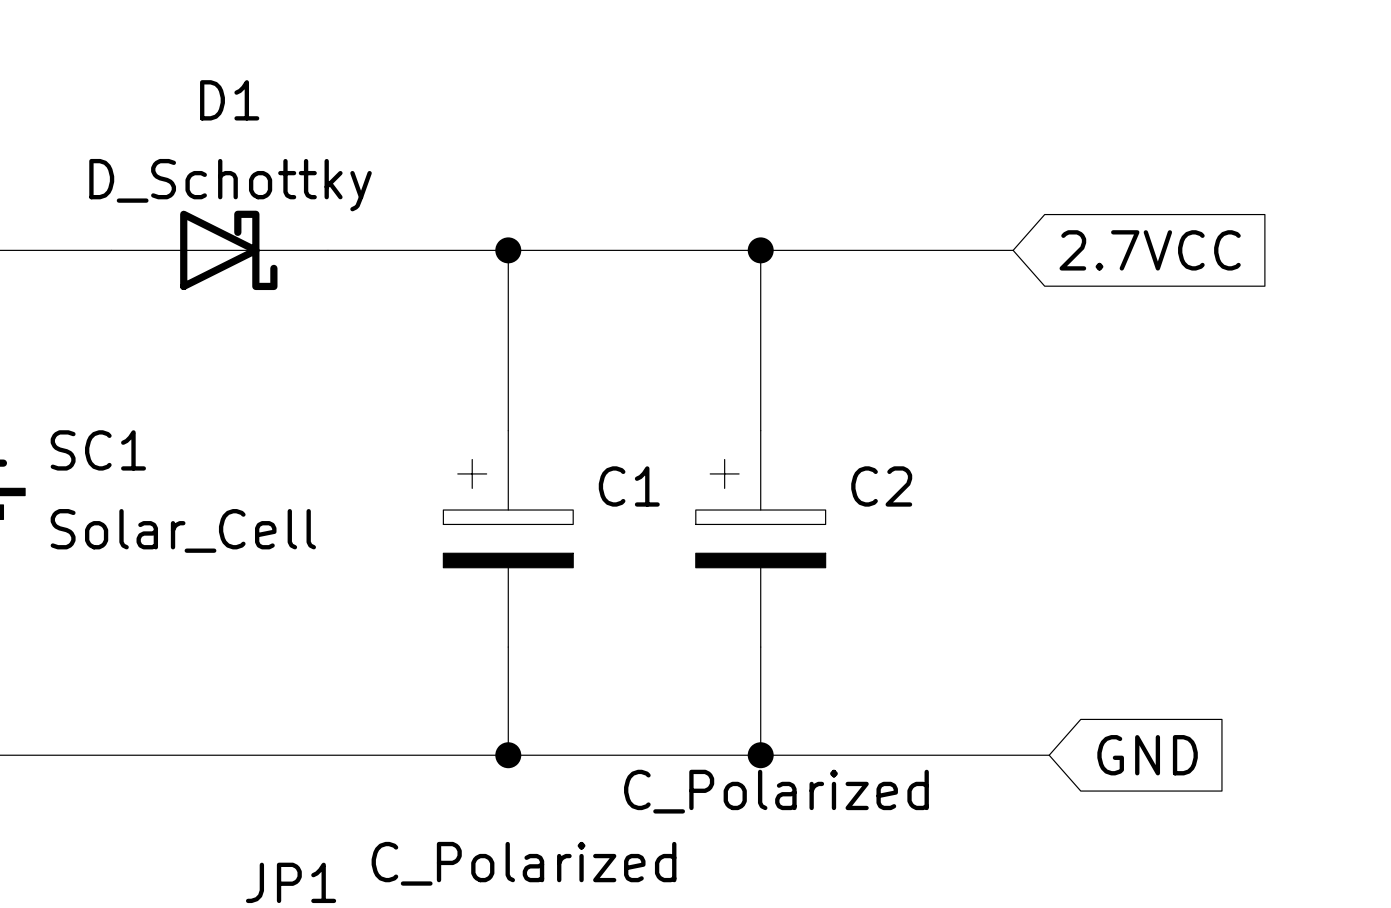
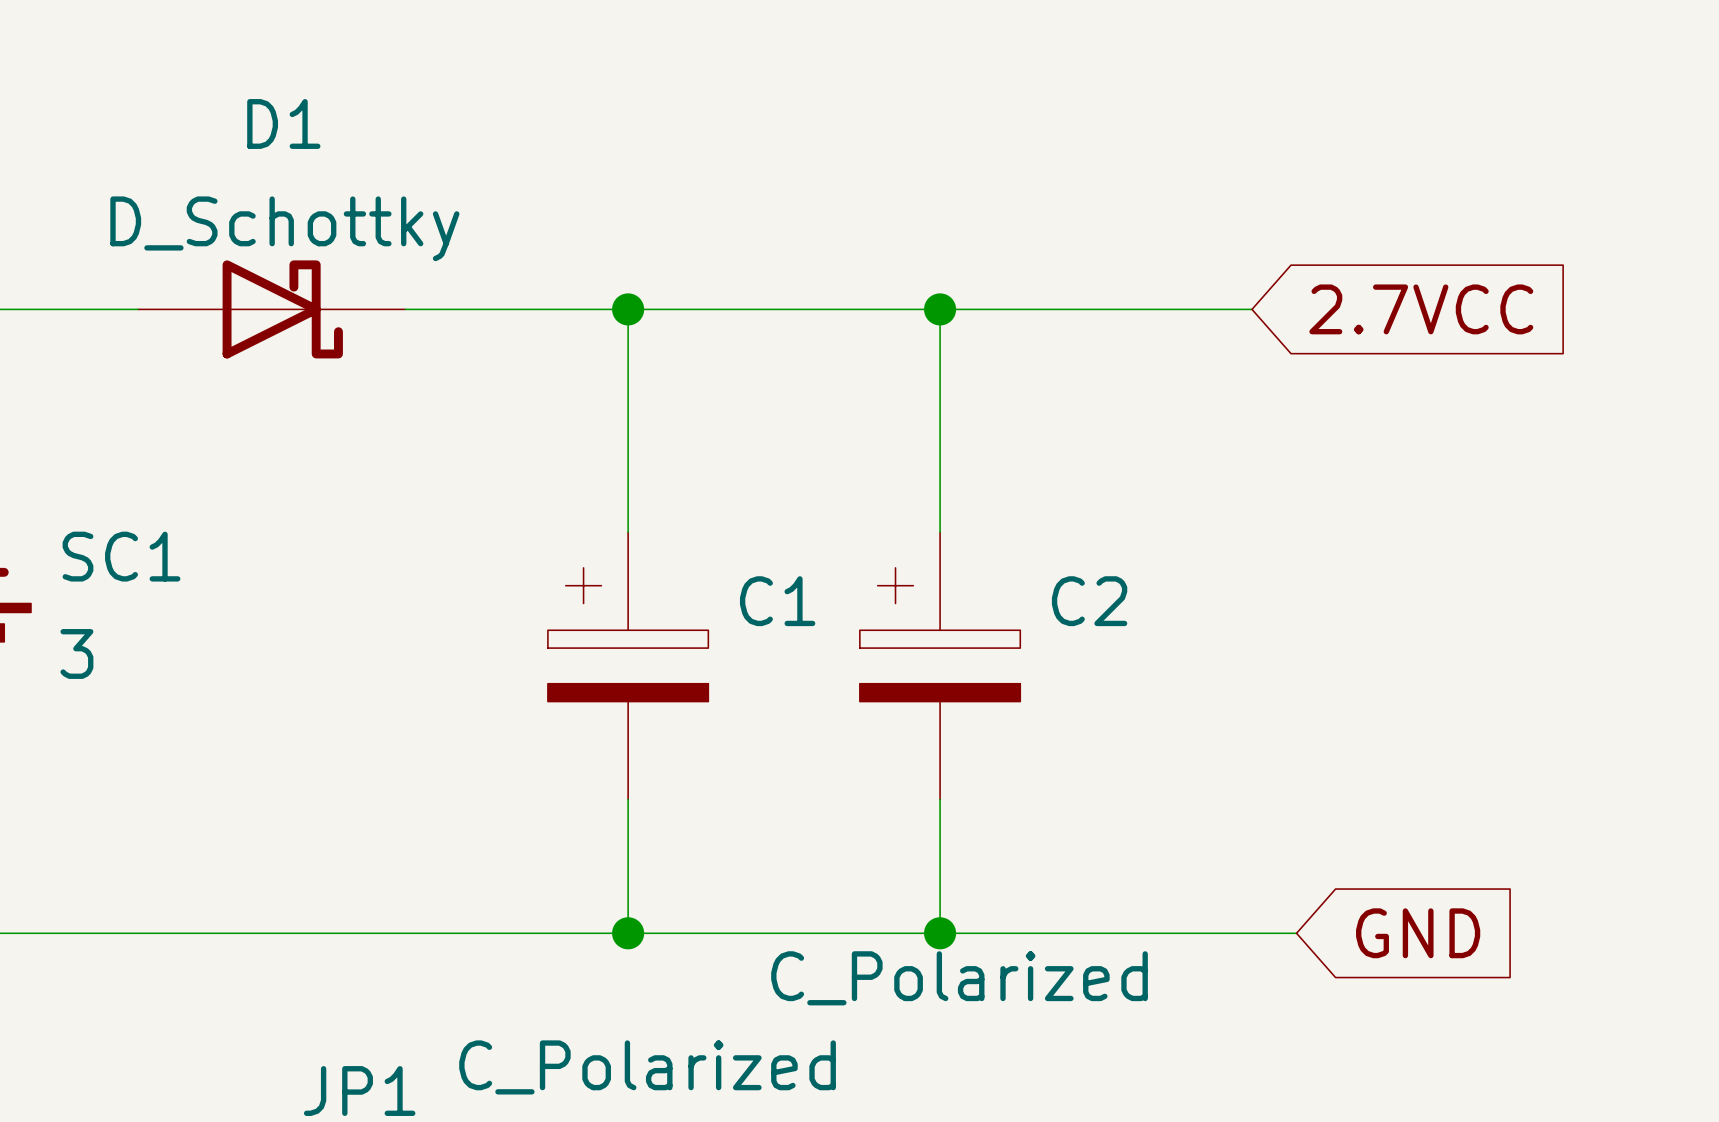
SC1 value: Solar_Cell (183, 530) -> 3 (76, 653)

